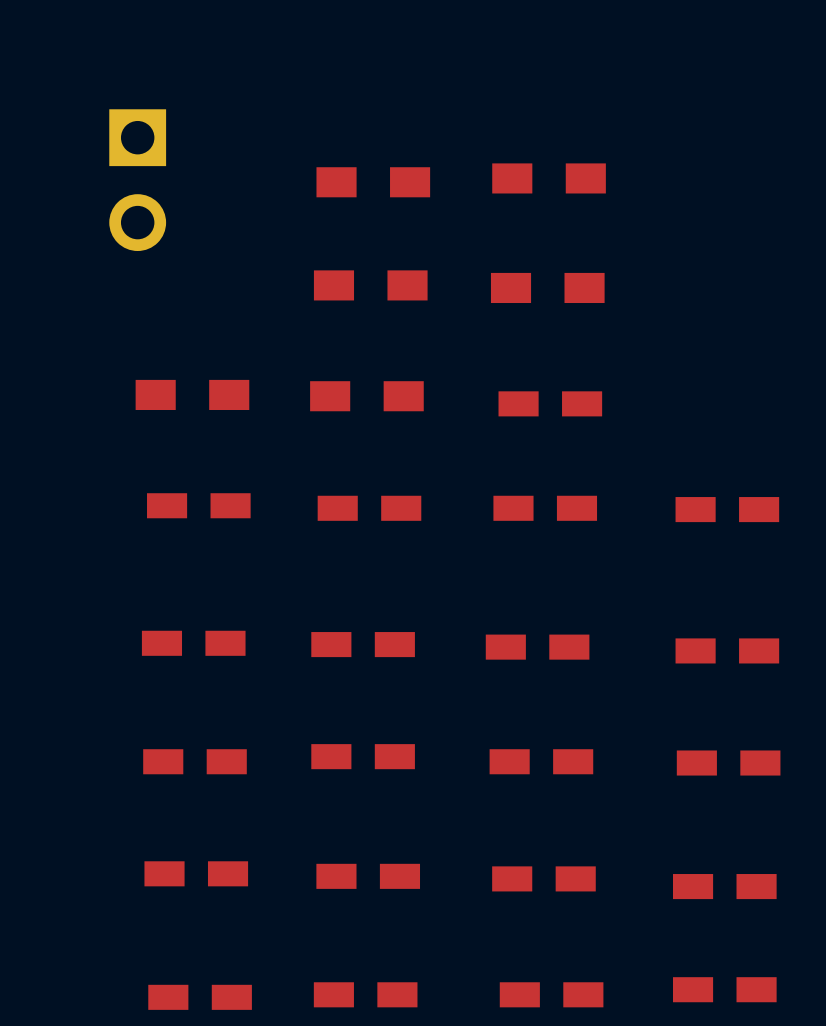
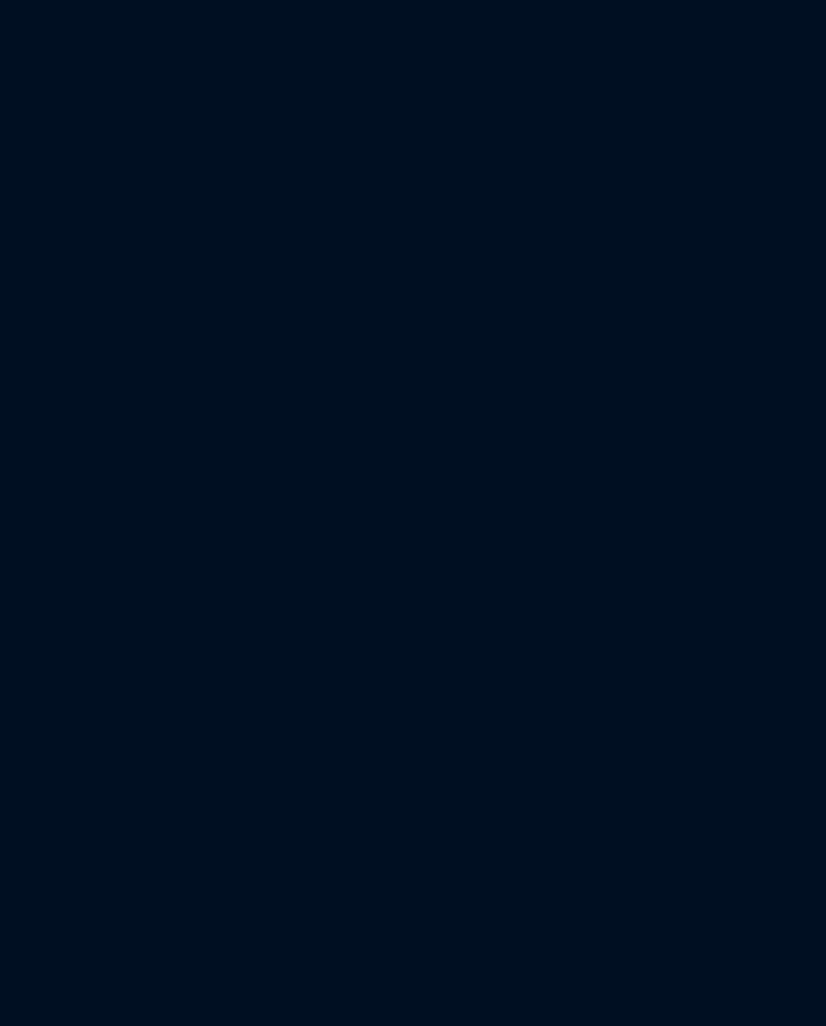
part: (549, 178) -> none
part: (137, 180) -> none
part: (373, 182) -> none
part: (370, 285) -> none
part: (547, 287) -> none
part: (192, 394) -> none
part: (366, 396) -> none
part: (550, 403) -> none
part: (198, 505) -> none
part: (369, 508) -> none
part: (545, 508) -> none
part: (727, 509) -> none
part: (193, 643) -> none
part: (363, 644) -> none
part: (537, 647) -> none
part: (727, 650) -> none
part: (363, 756) -> none
part: (195, 761) -> none
part: (541, 761) -> none
part: (728, 763) -> none
part: (196, 873) -> none
part: (368, 876) -> none
part: (543, 878) -> none
part: (724, 886) -> none
part: (724, 989) -> none
part: (365, 994) -> none
part: (551, 994) -> none
part: (200, 997) -> none

